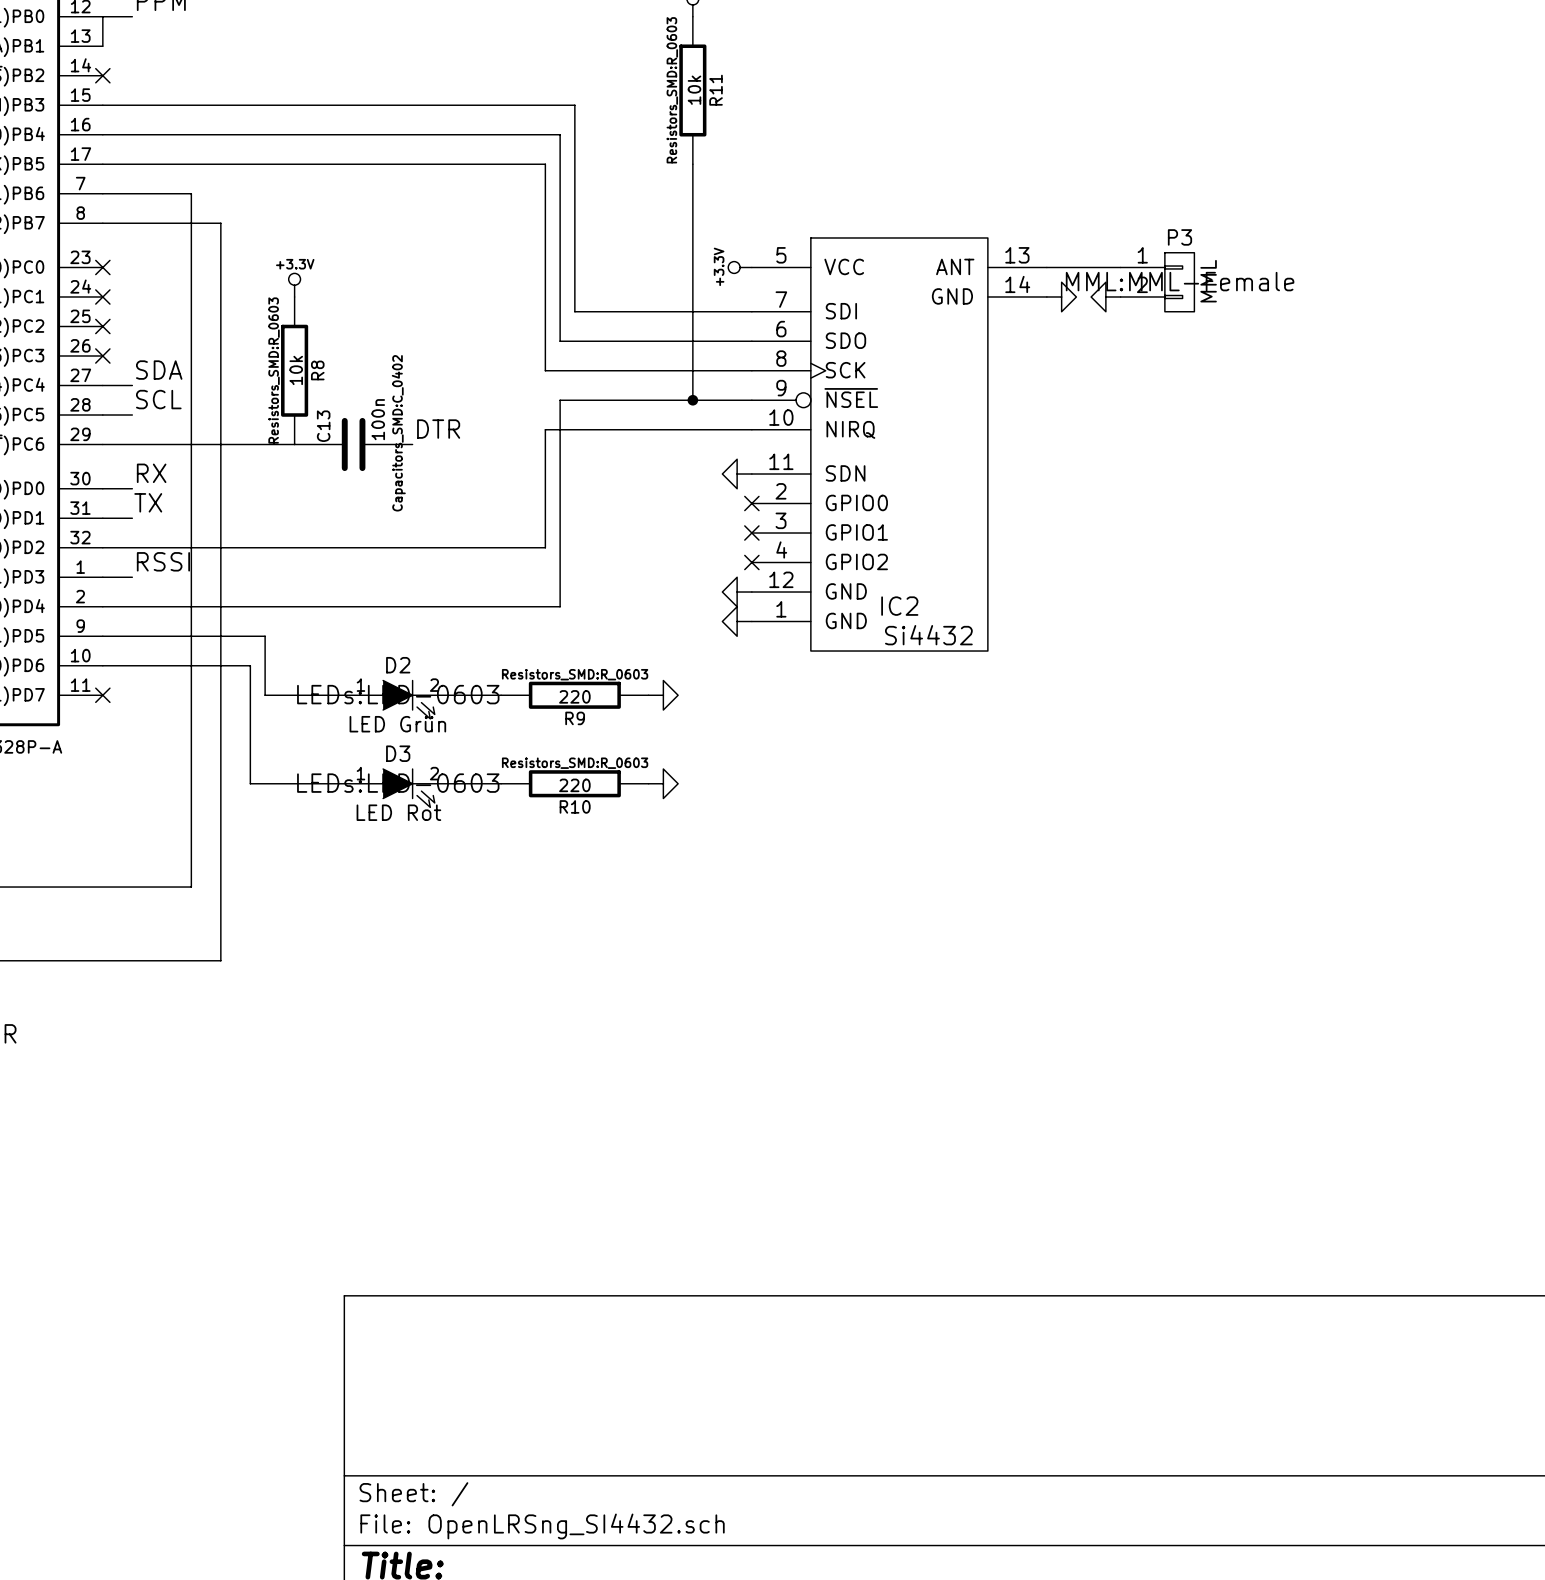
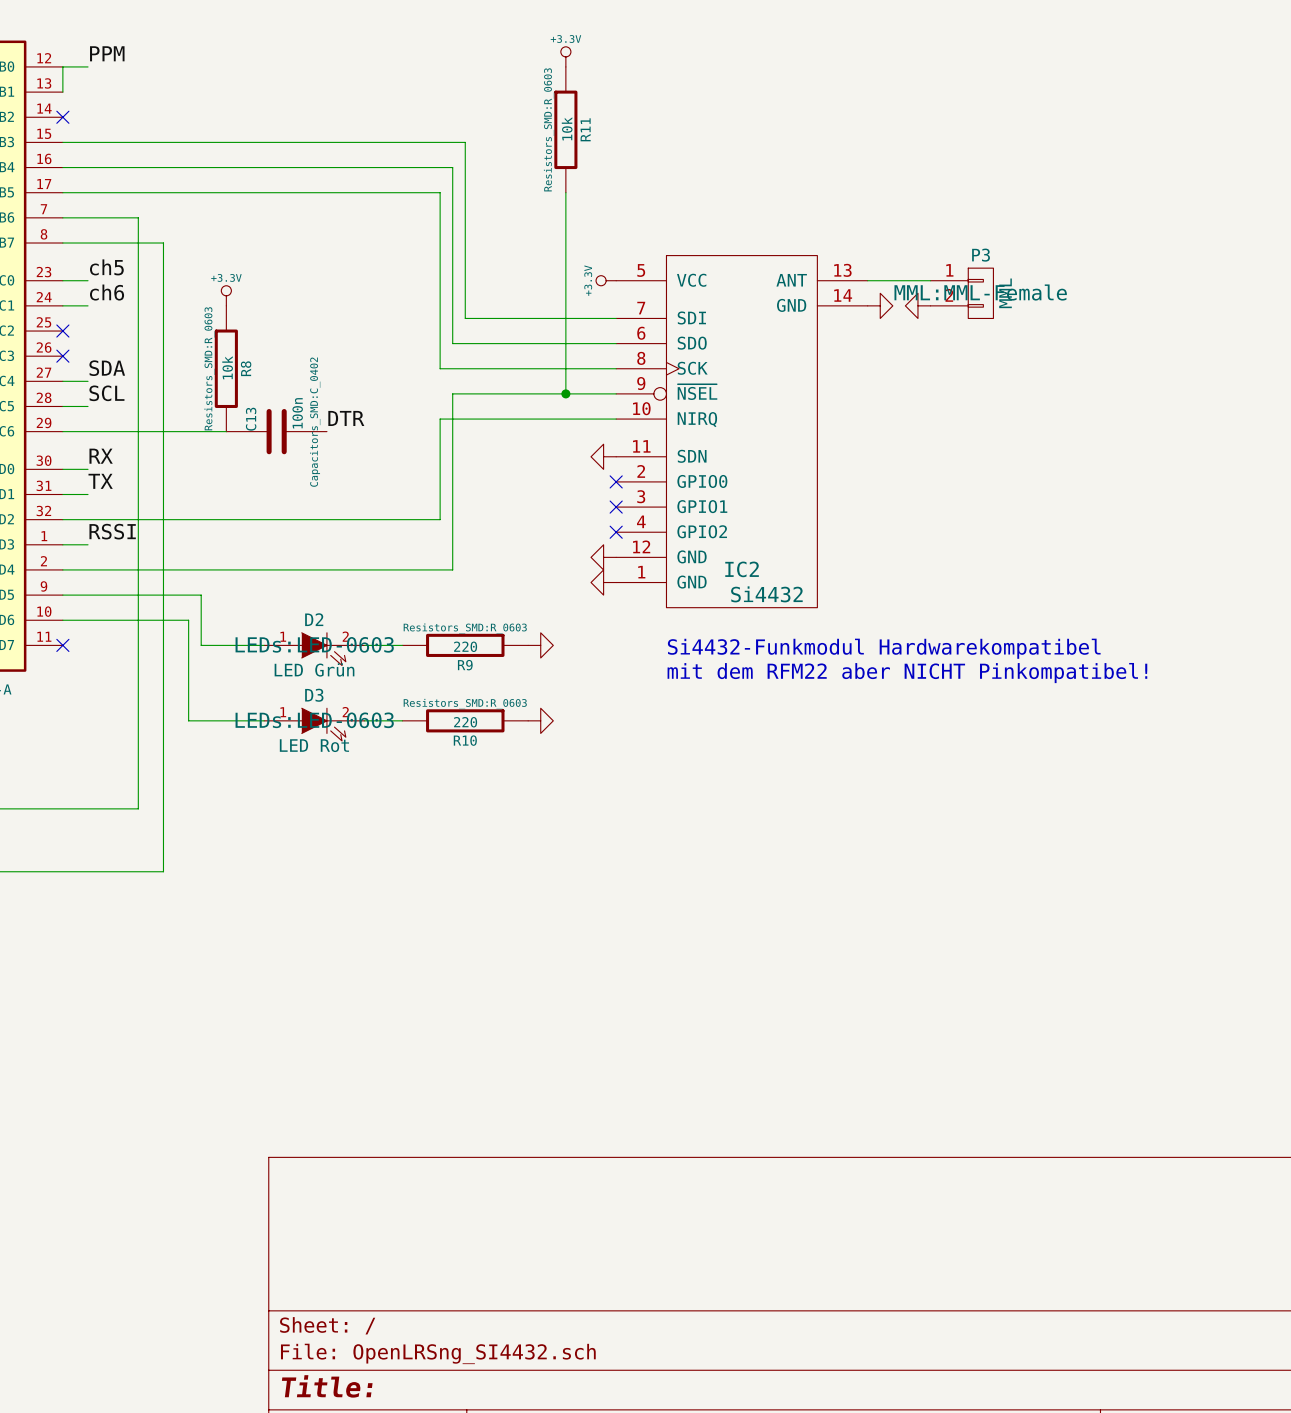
label: none -> ch5 (106, 267)
wire: none -> (62, 280) (88, 280)
no-connect mark: (102, 267) -> none
label: none -> ch6 (107, 292)
wire: none -> (62, 305) (88, 305)
no-connect mark: (102, 296) -> none
text: none -> Si4432-Funkmodul Hardwarekompatibel (884, 648)
text: none -> mit dem RFM22 aber NICHT Pinkompatibel! (907, 673)

